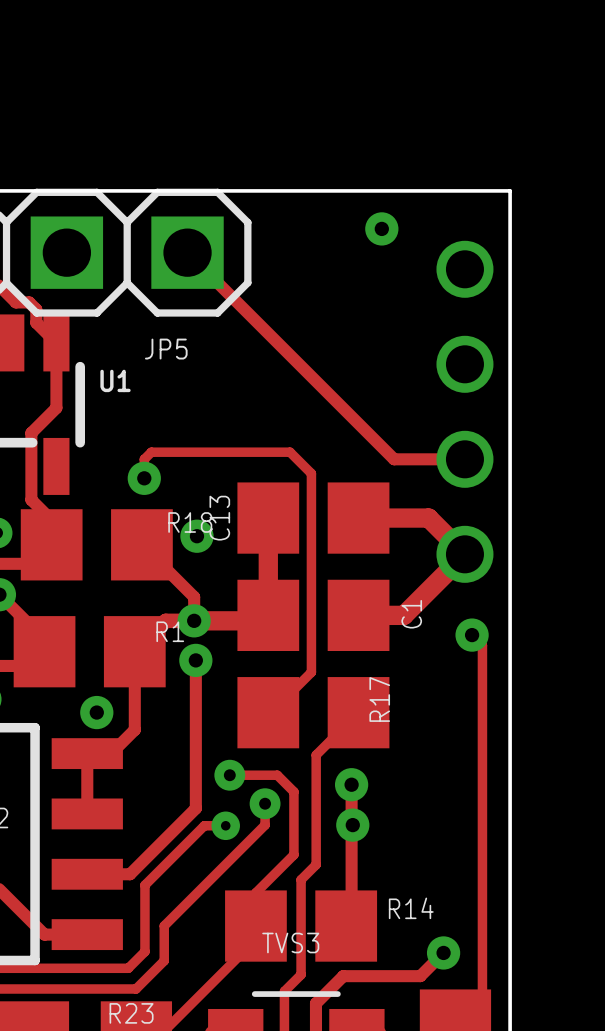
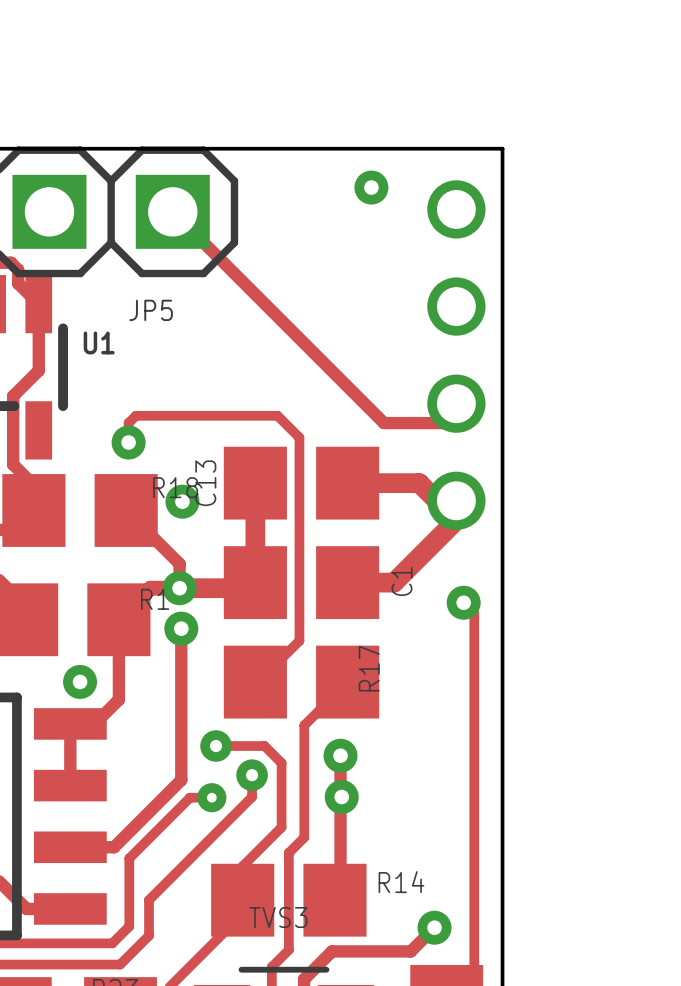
part position: (464, 411) -> (456, 355)

